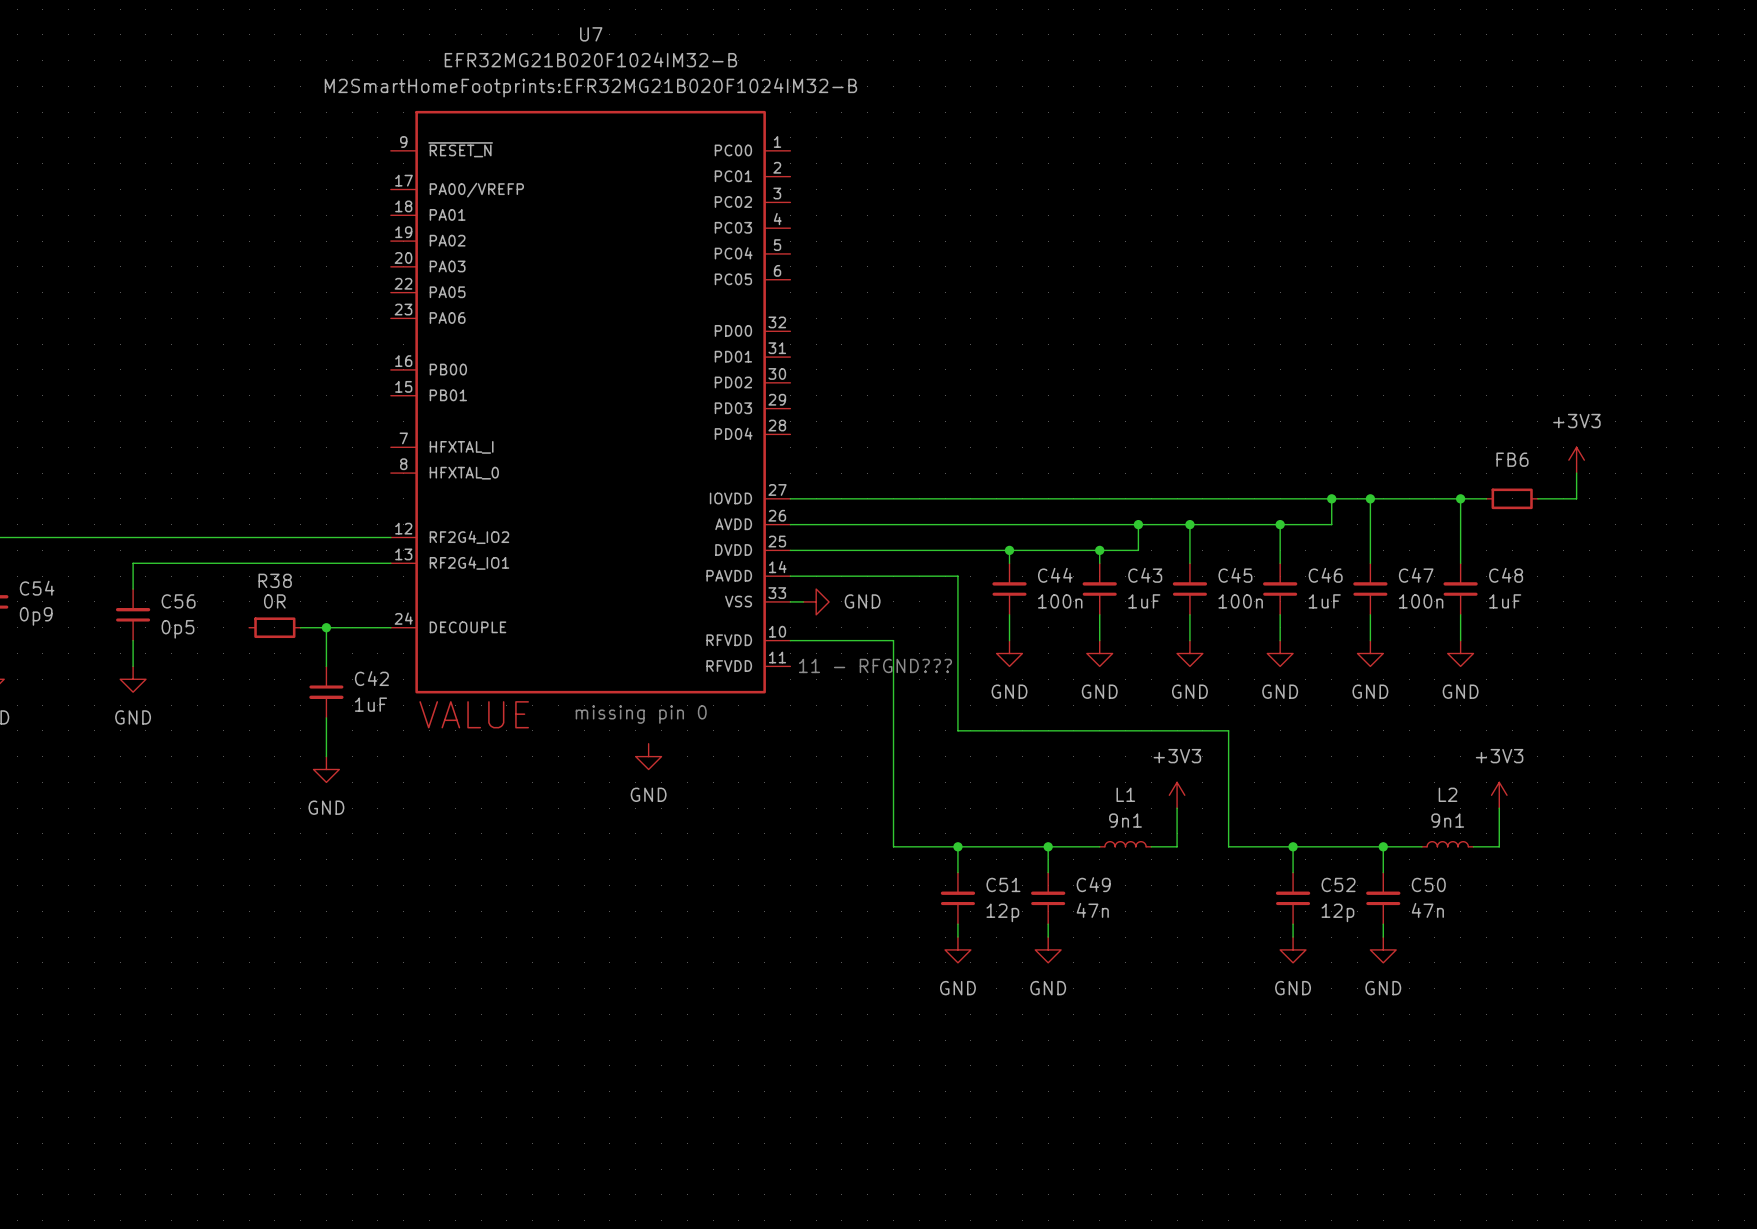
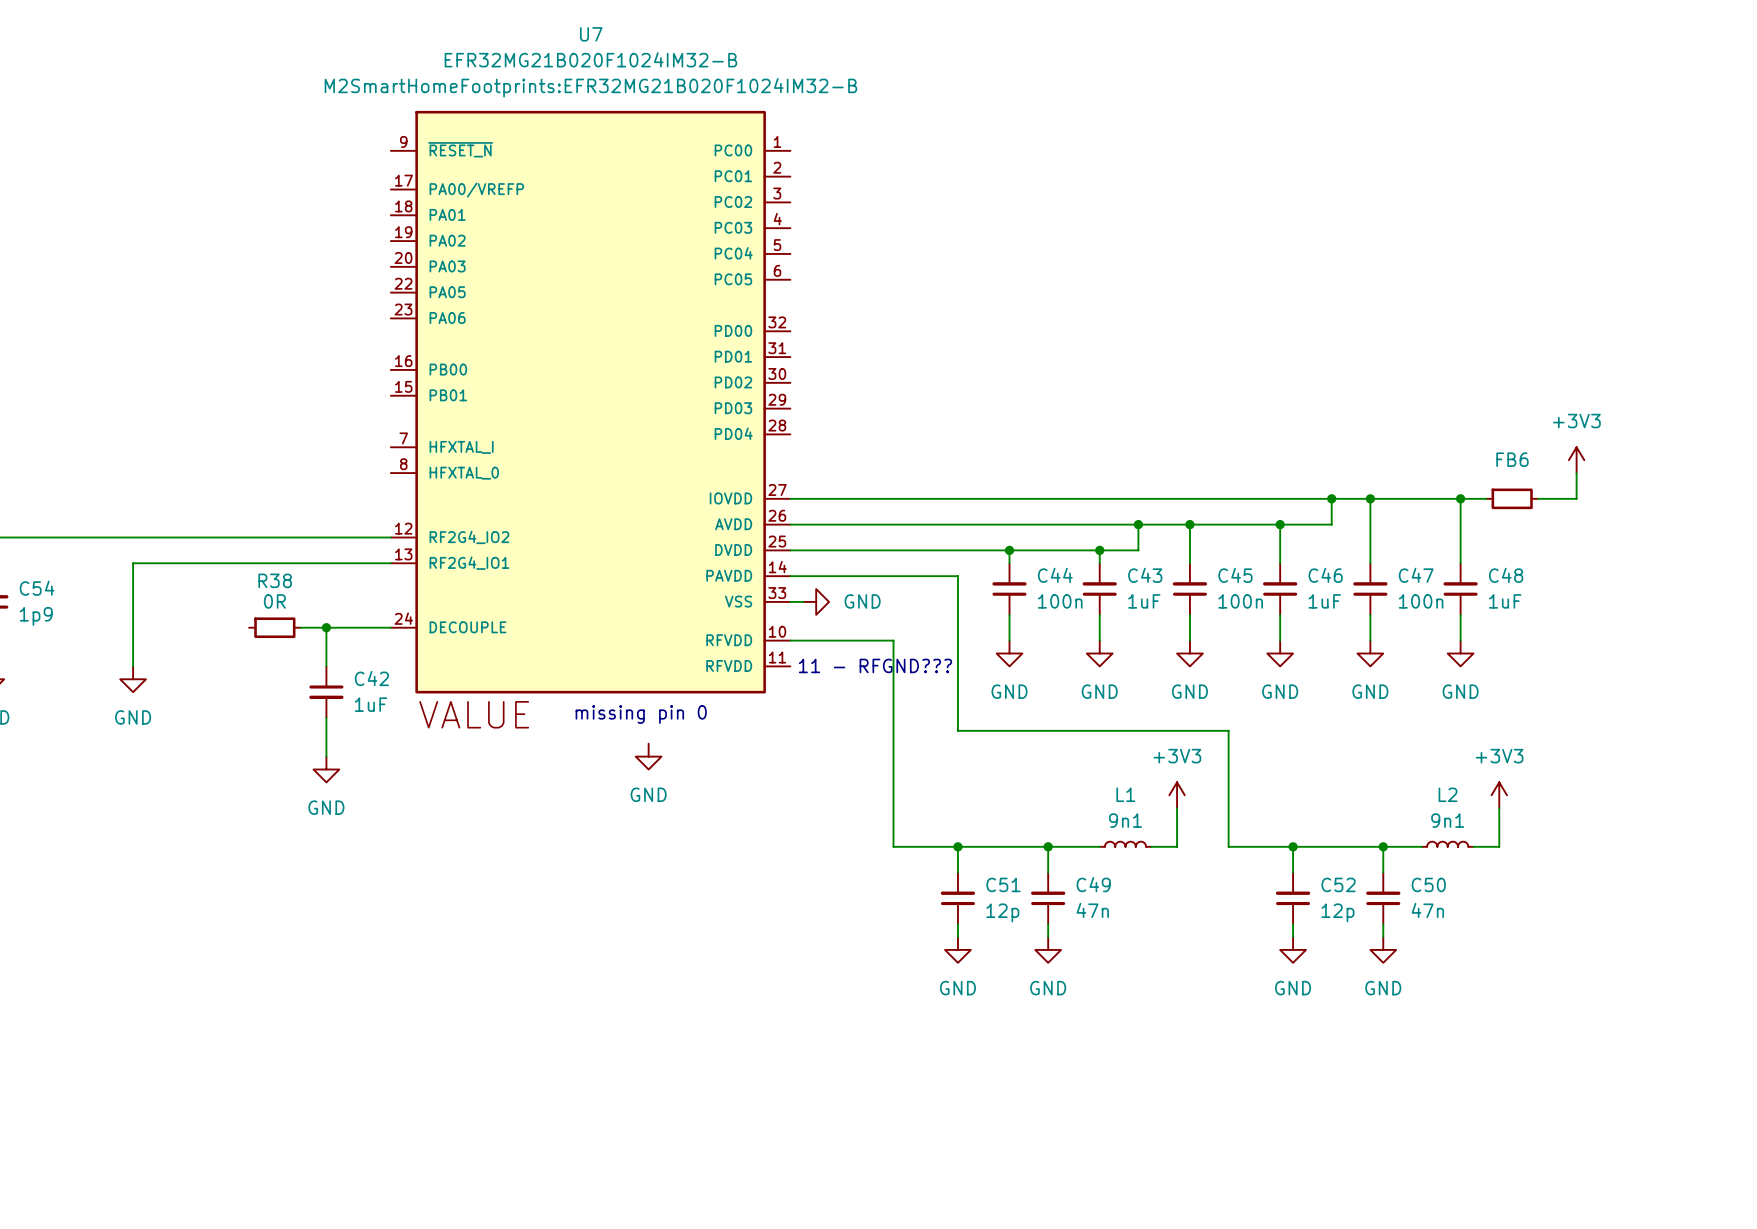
C56: (133, 614) -> none
C54 text: 0p9 (36, 616) -> 1p9 (36, 616)

